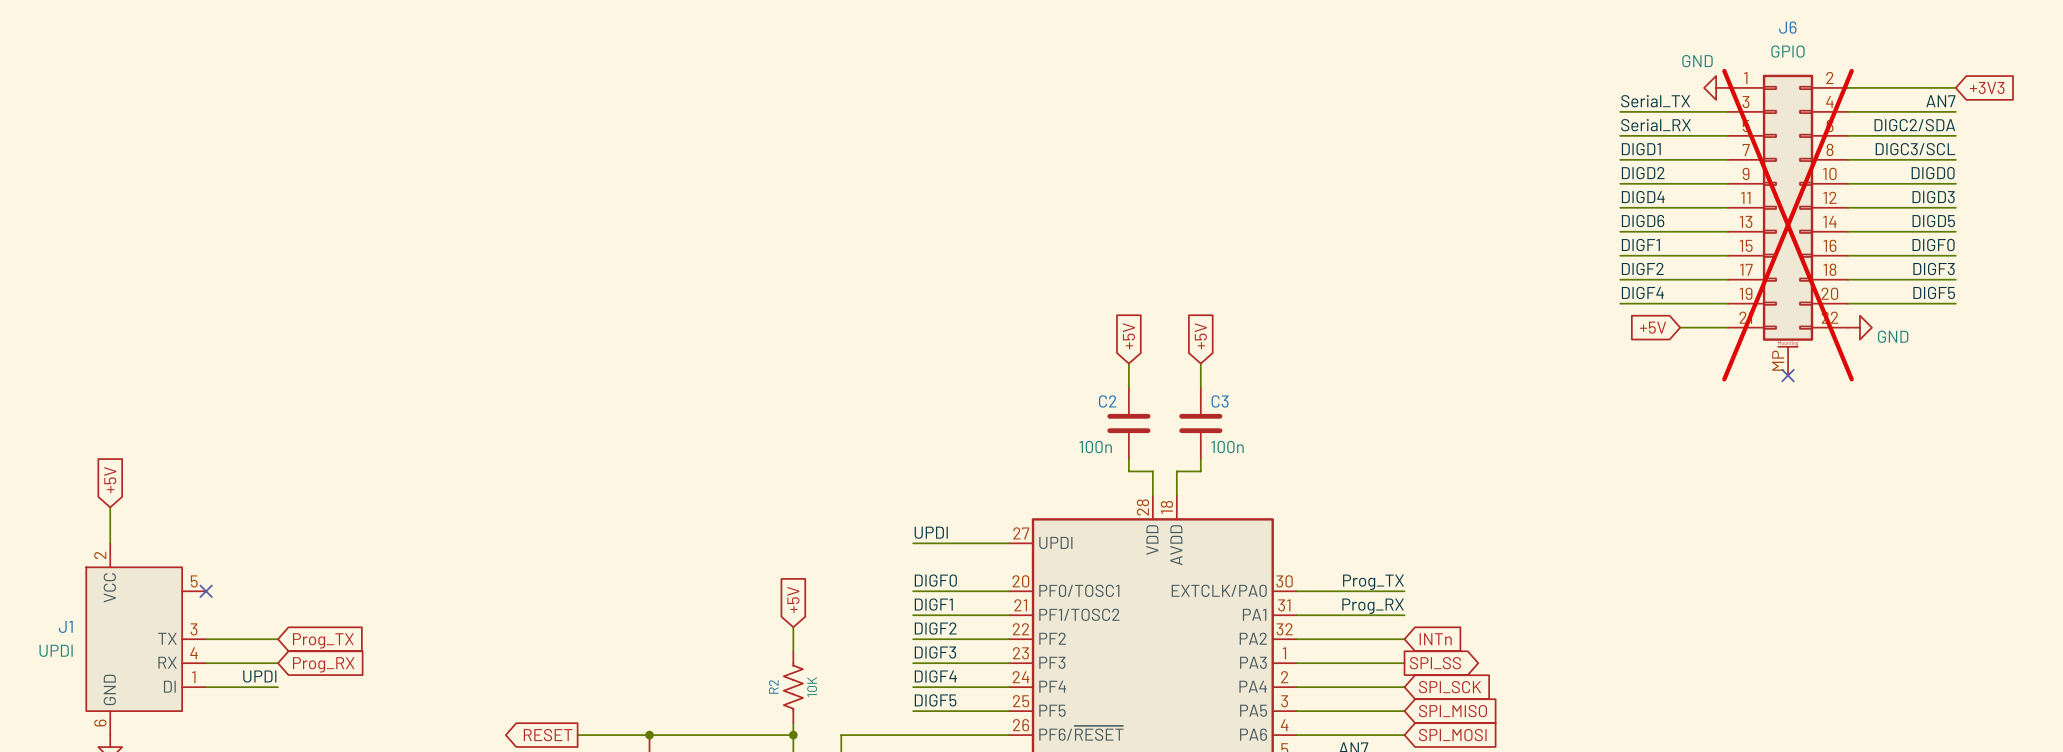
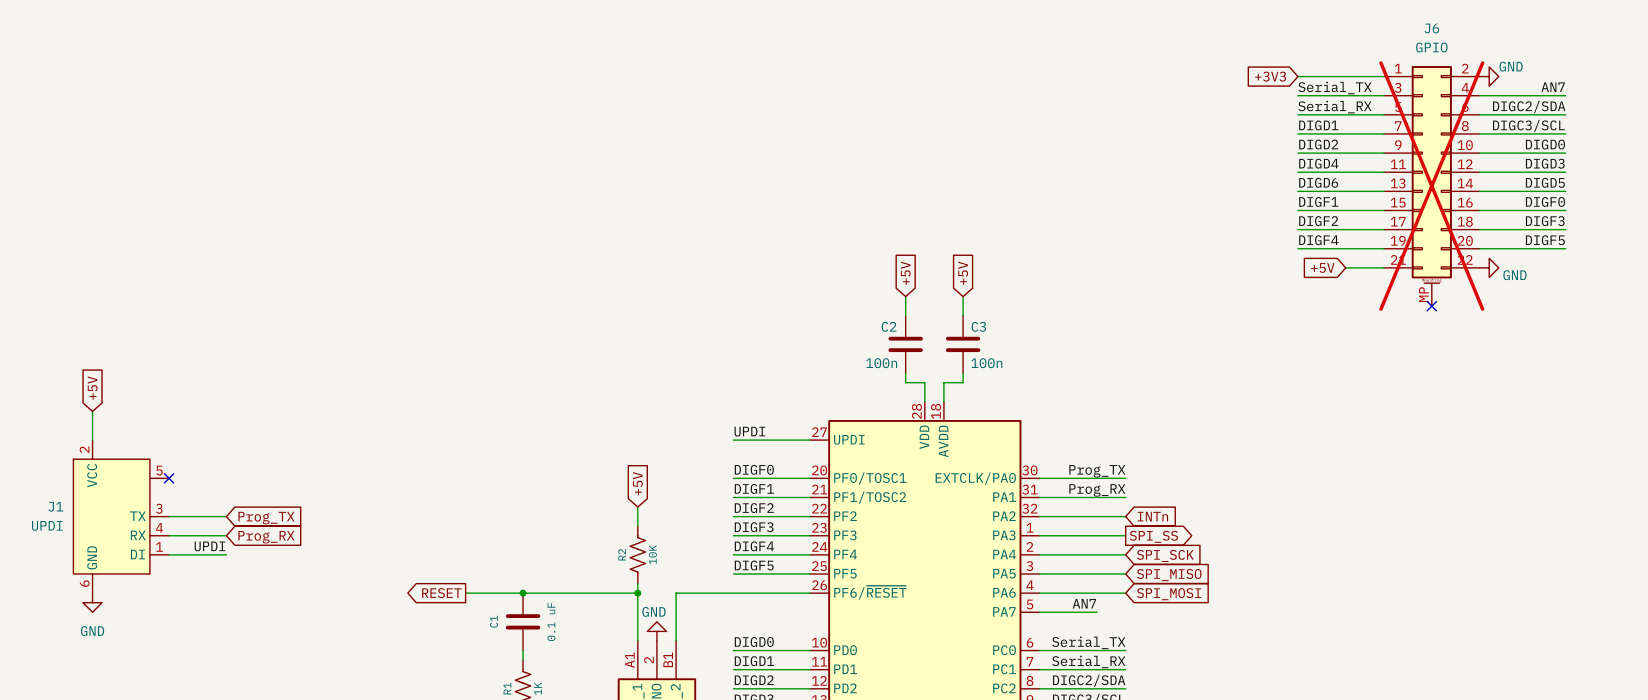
power symbol text position: GND (1697, 61) -> GND (1511, 66)
power symbol rotation: 0° (1716, 87) -> 180° (1489, 76)
power symbol position: GND (1716, 87) -> GND (1489, 76)
wire: (1847, 87) (1955, 87) -> (1297, 76) (1383, 76)
global label: none -> +3V3 (1270, 76)
global label: +3V3 (1987, 88) -> none

